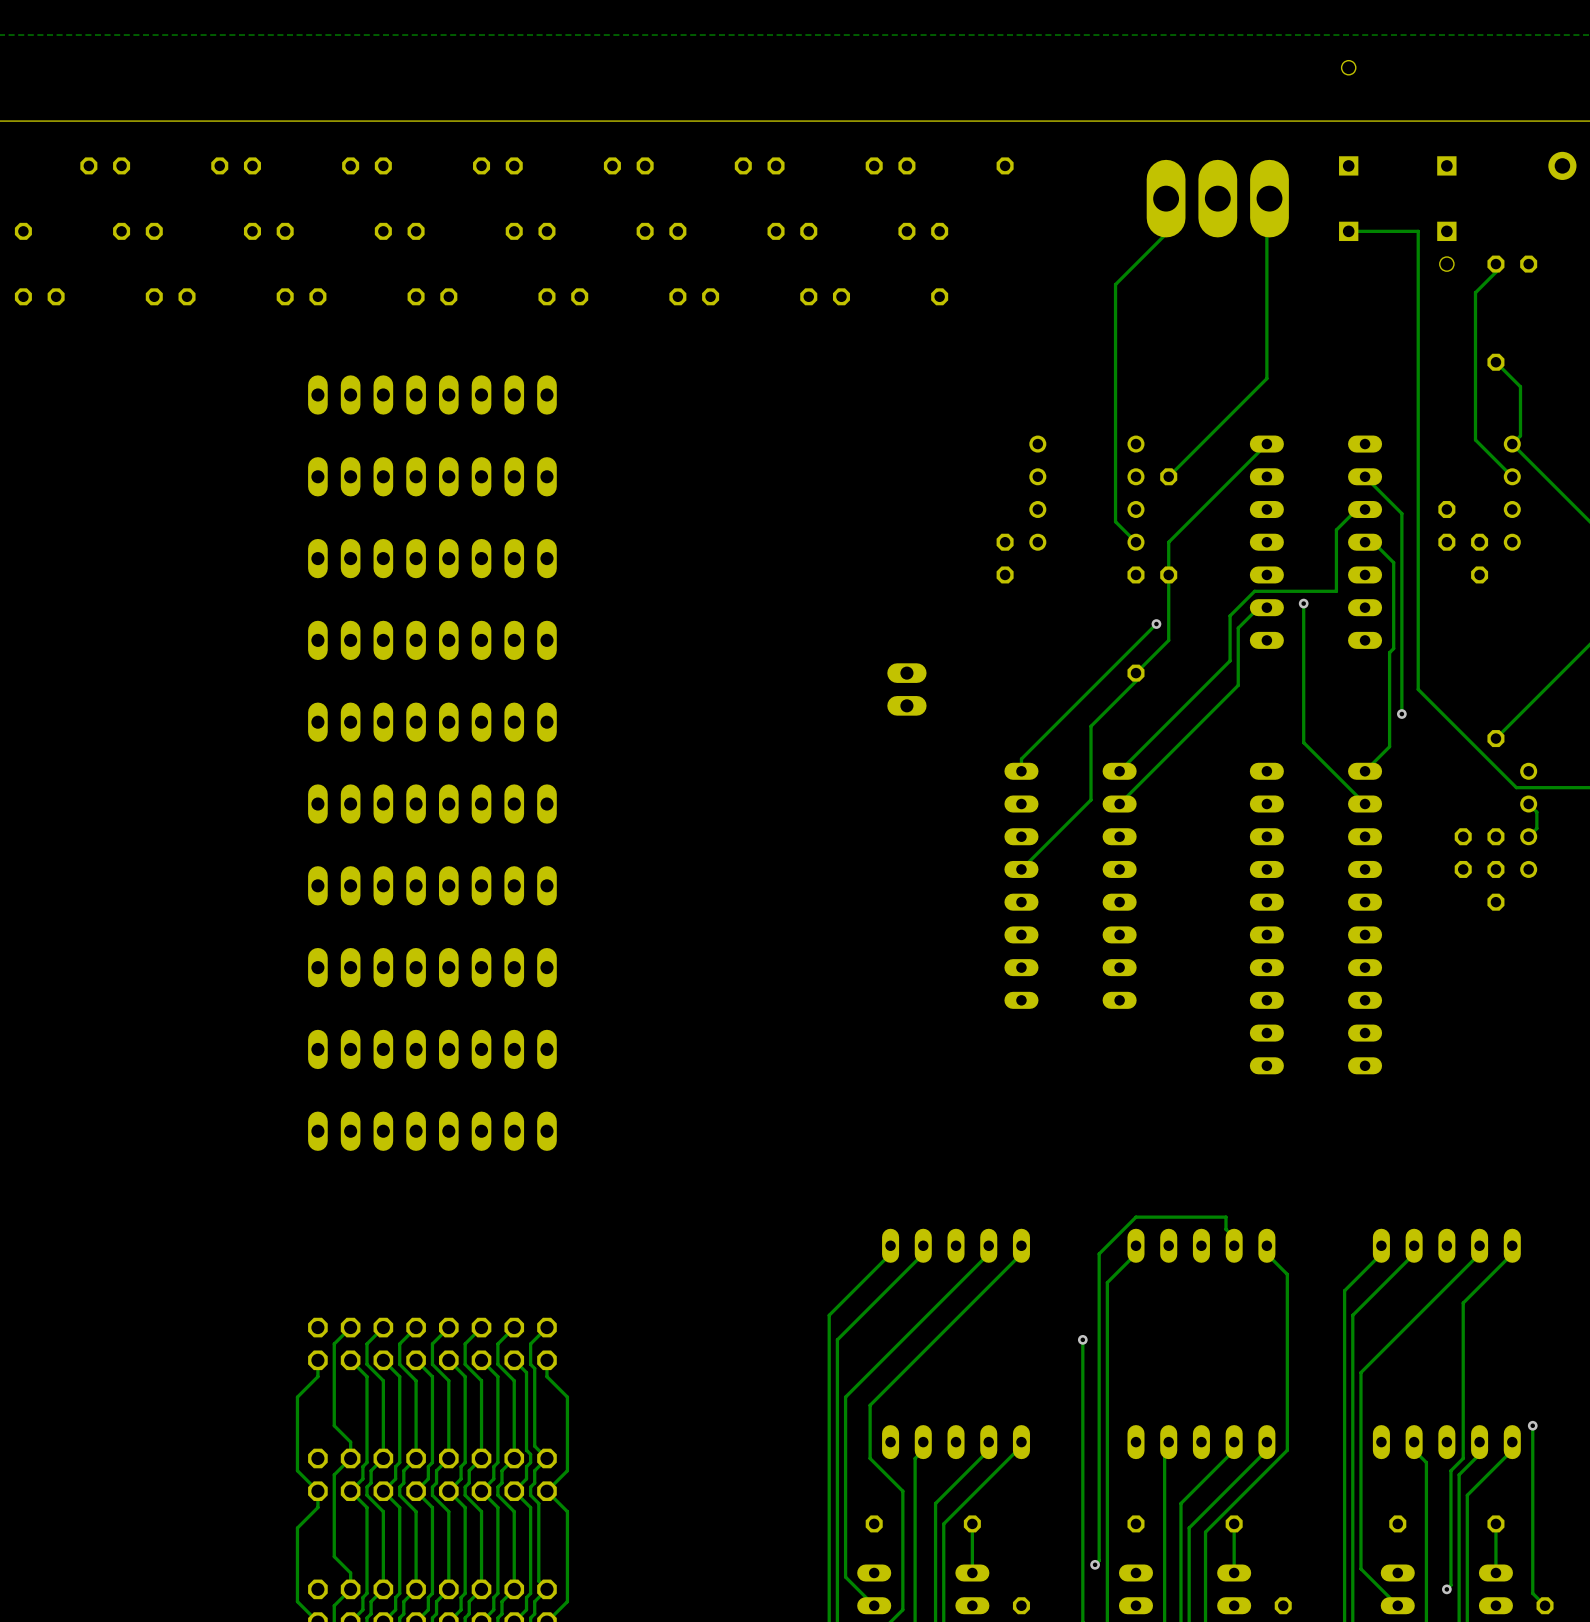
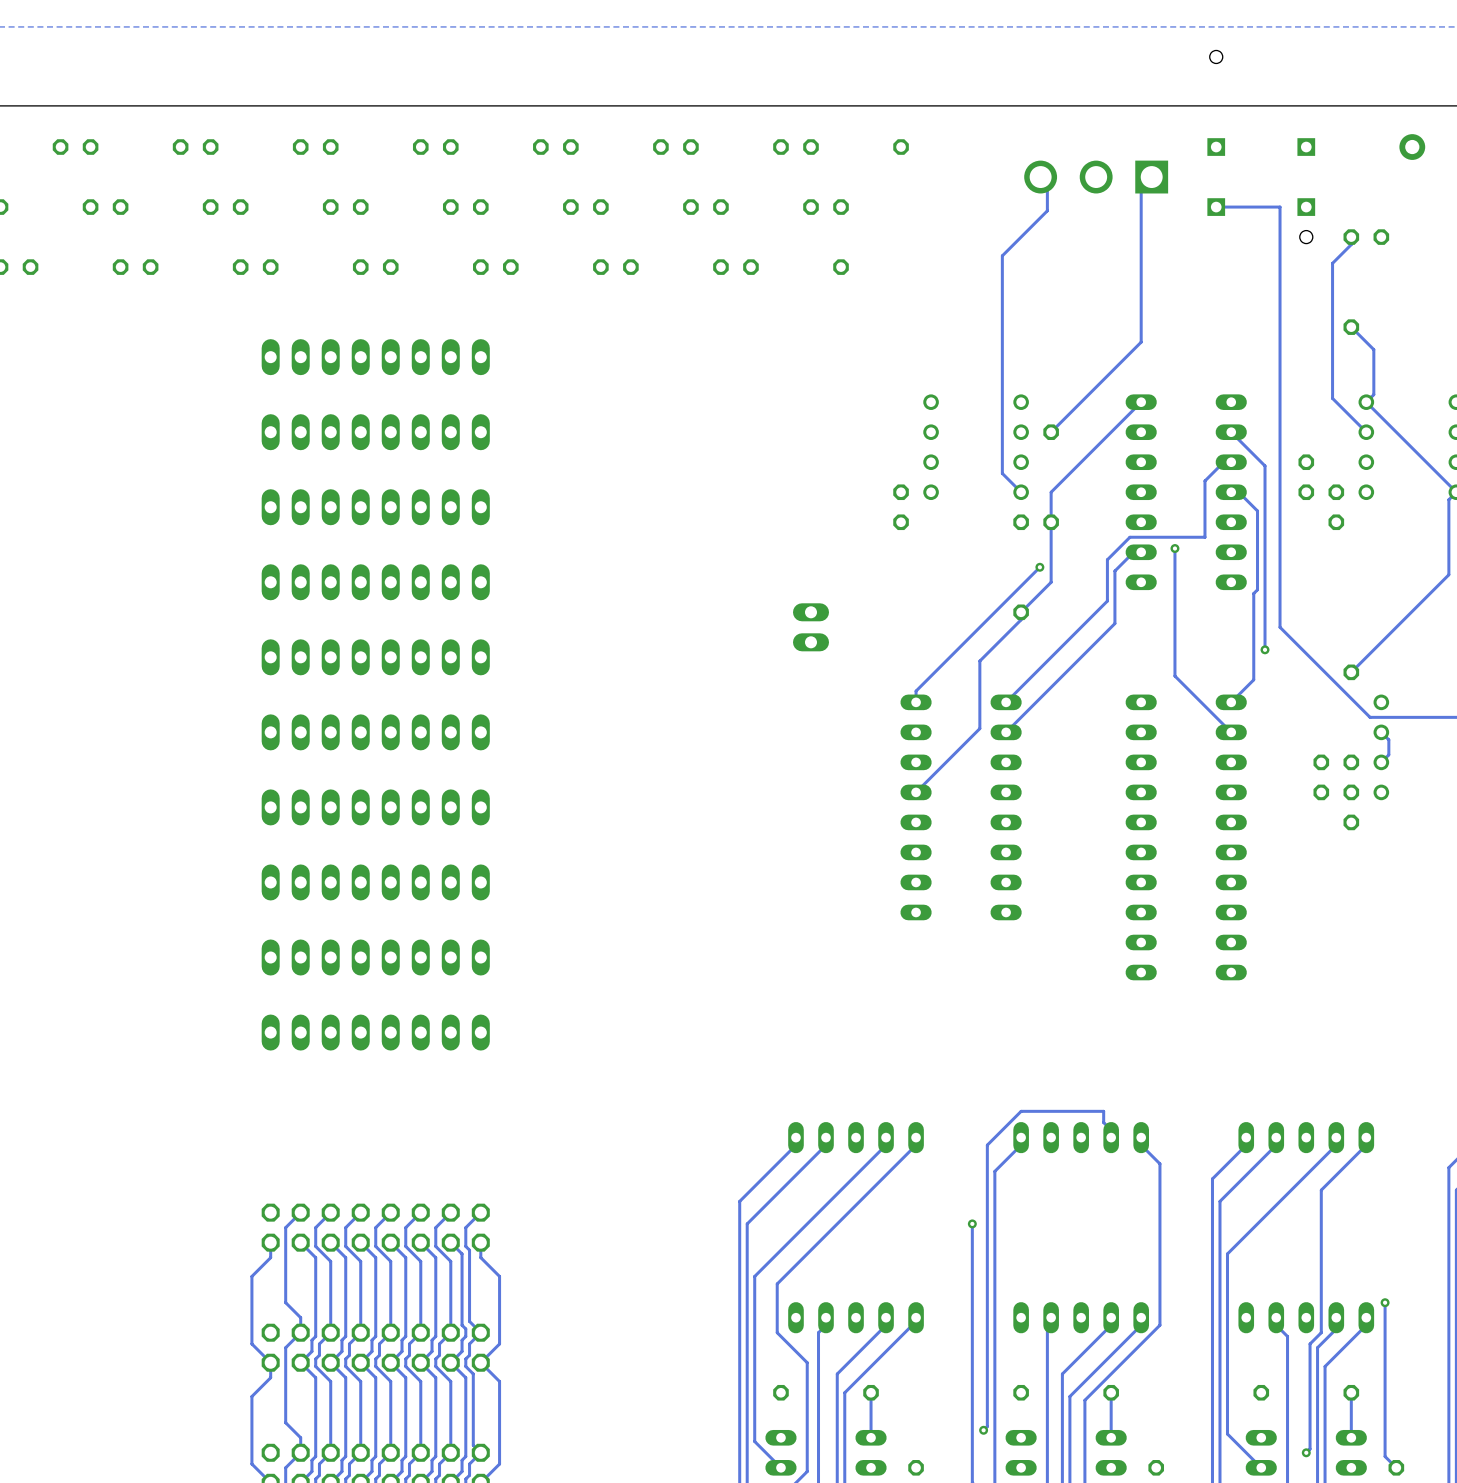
part footprint: [1146, 159, 1289, 238] -> [1024, 160, 1169, 194]

